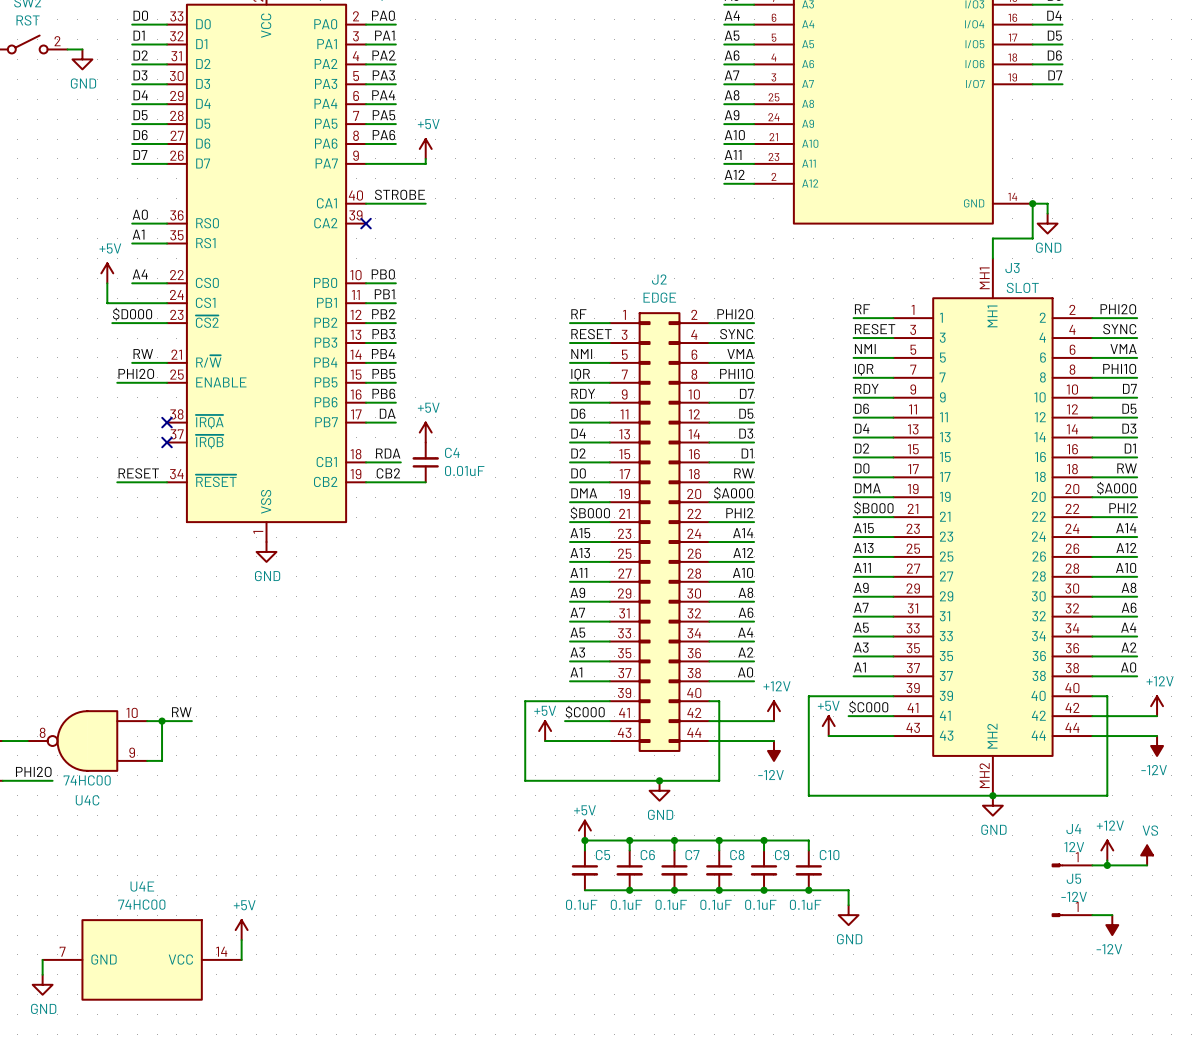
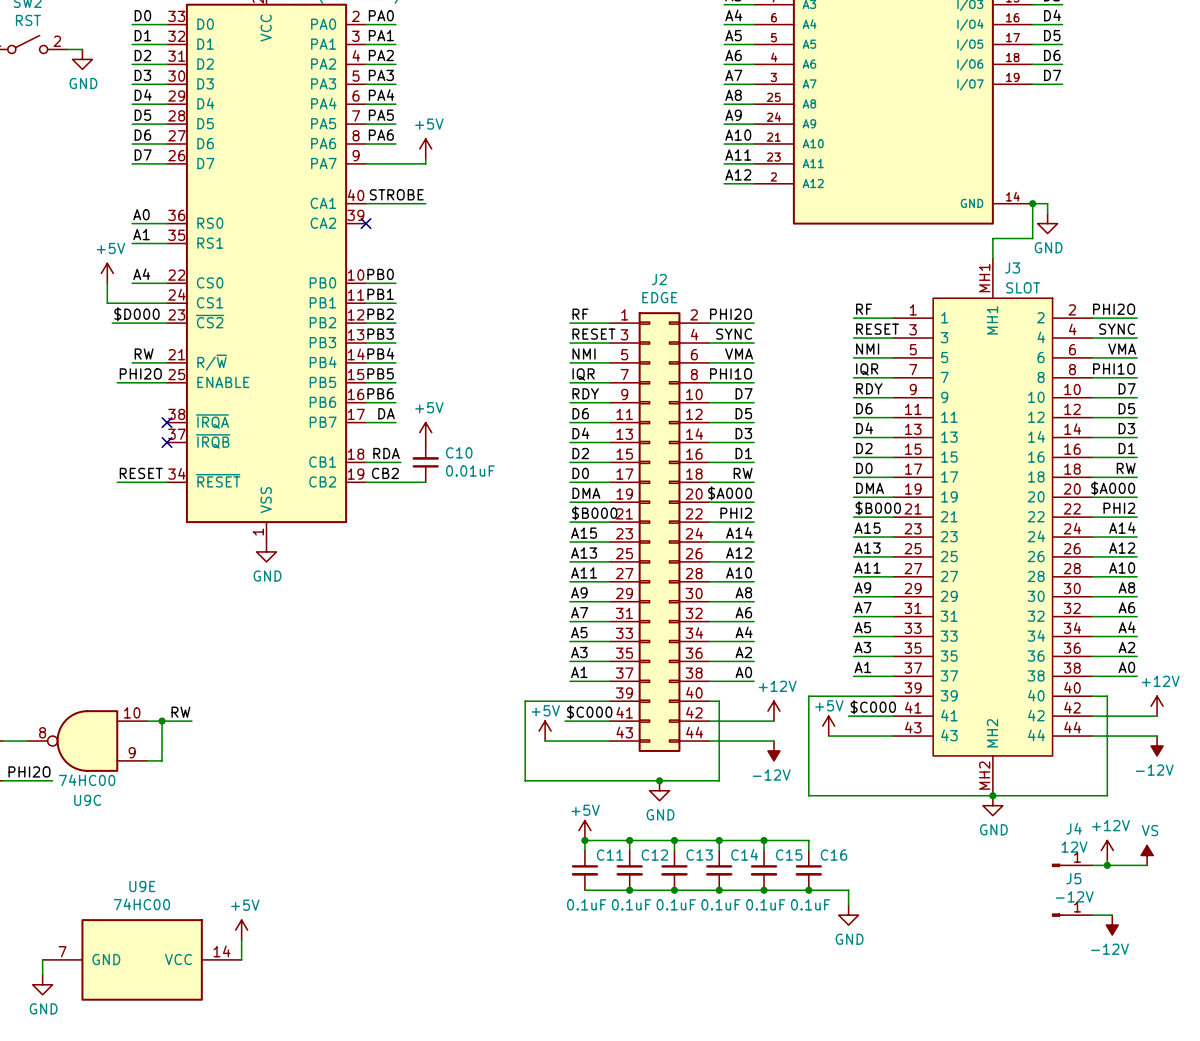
C4 name: C4 (452, 452) -> C10 (459, 452)
U4C name: U4C (87, 800) -> U9C (87, 800)
C5 name: C5 (603, 855) -> C11 (610, 855)
C6 name: C6 (647, 855) -> C12 (654, 855)
C7 name: C7 (692, 855) -> C13 (699, 855)
C8 name: C8 (737, 855) -> C14 (744, 854)
C9 name: C9 (782, 855) -> C15 (789, 855)
C10 name: C10 (829, 855) -> C16 (833, 855)
U4E name: U4E (142, 886) -> U9E (142, 886)

